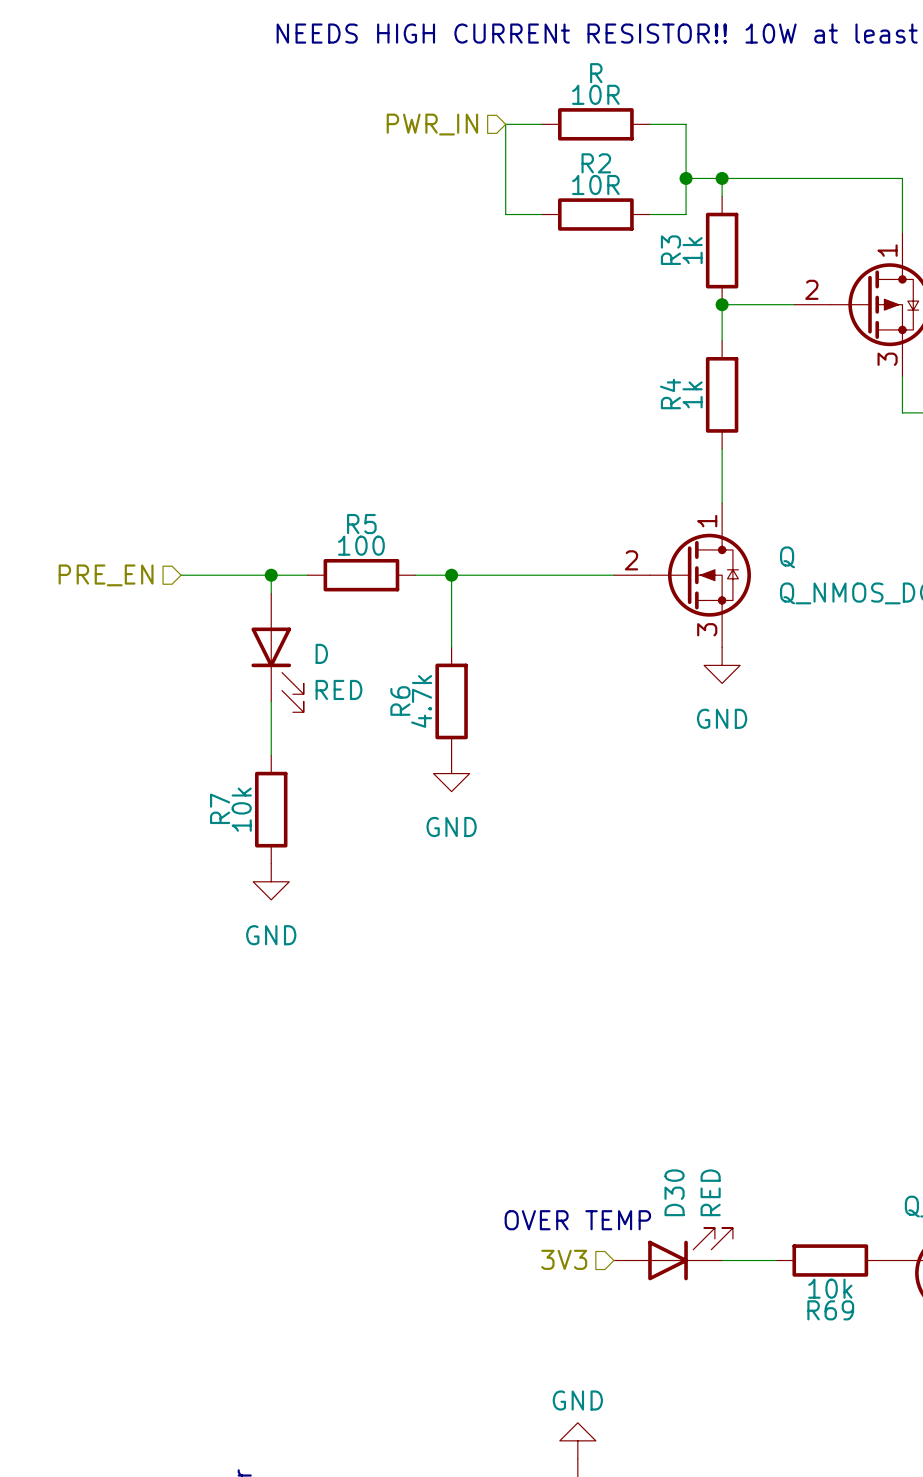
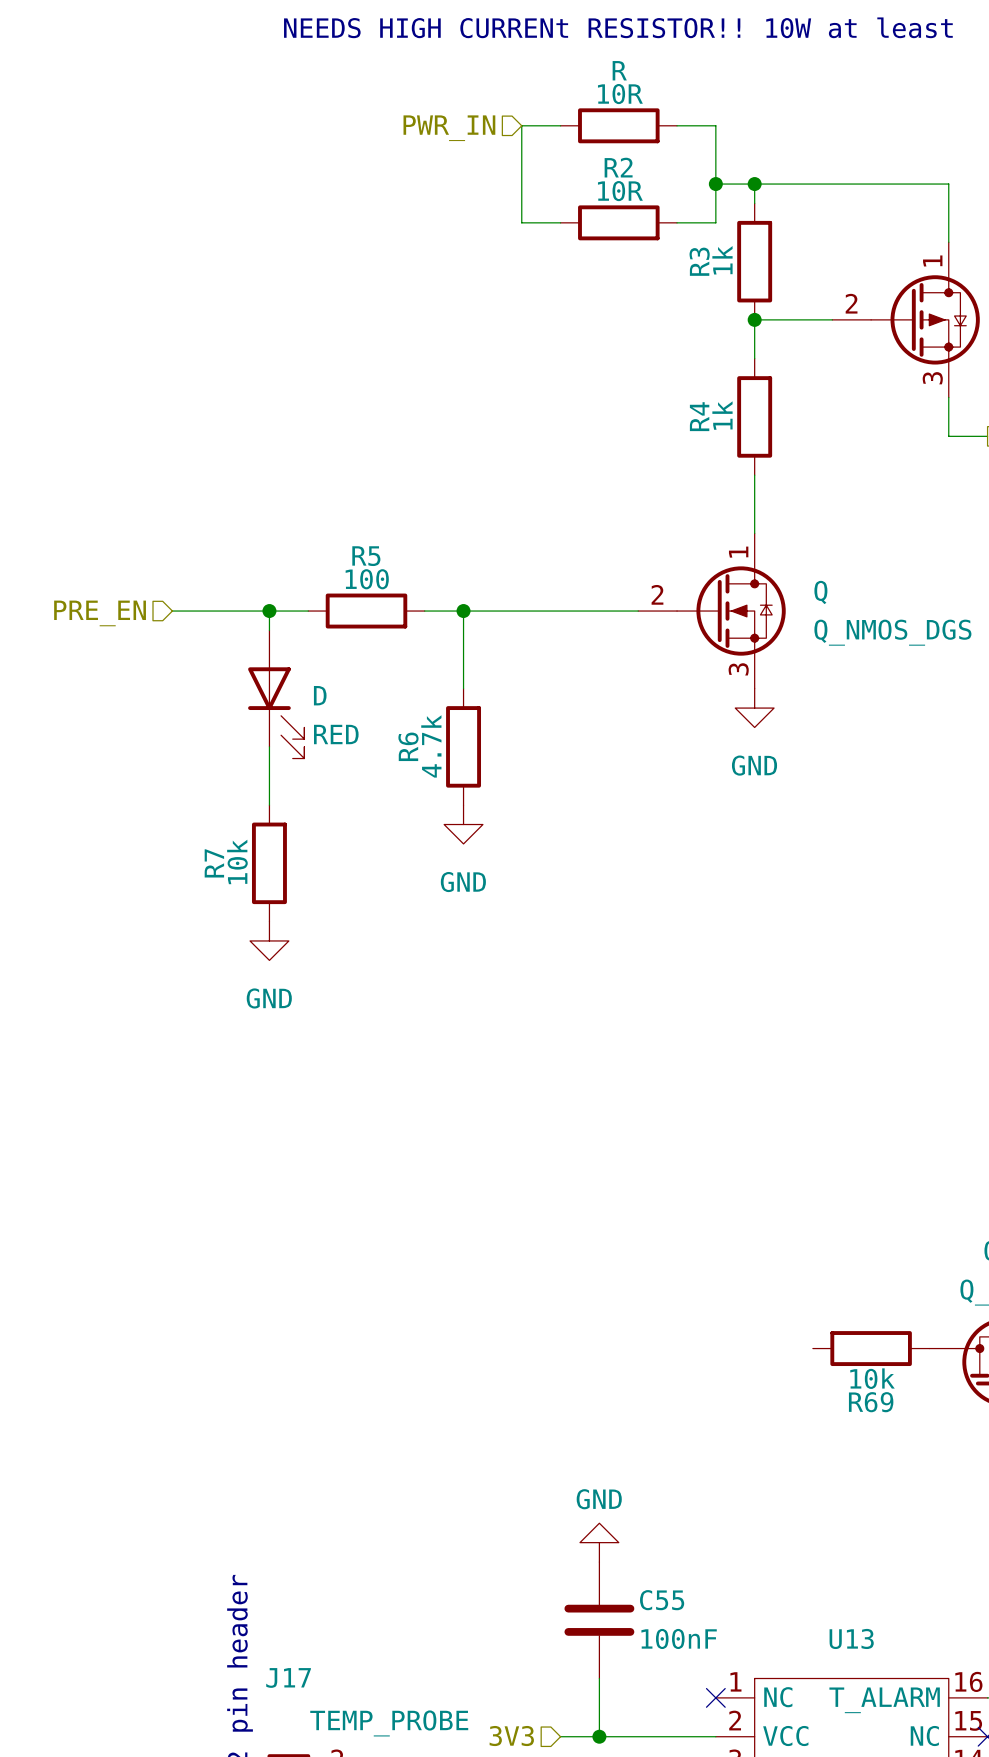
text: OVER TEMP (577, 1220) -> none
D30: RED (673, 1254) -> none
hierarchical label: 3V3 (564, 1259) -> none
wire: (722, 1260) (776, 1260) -> none

